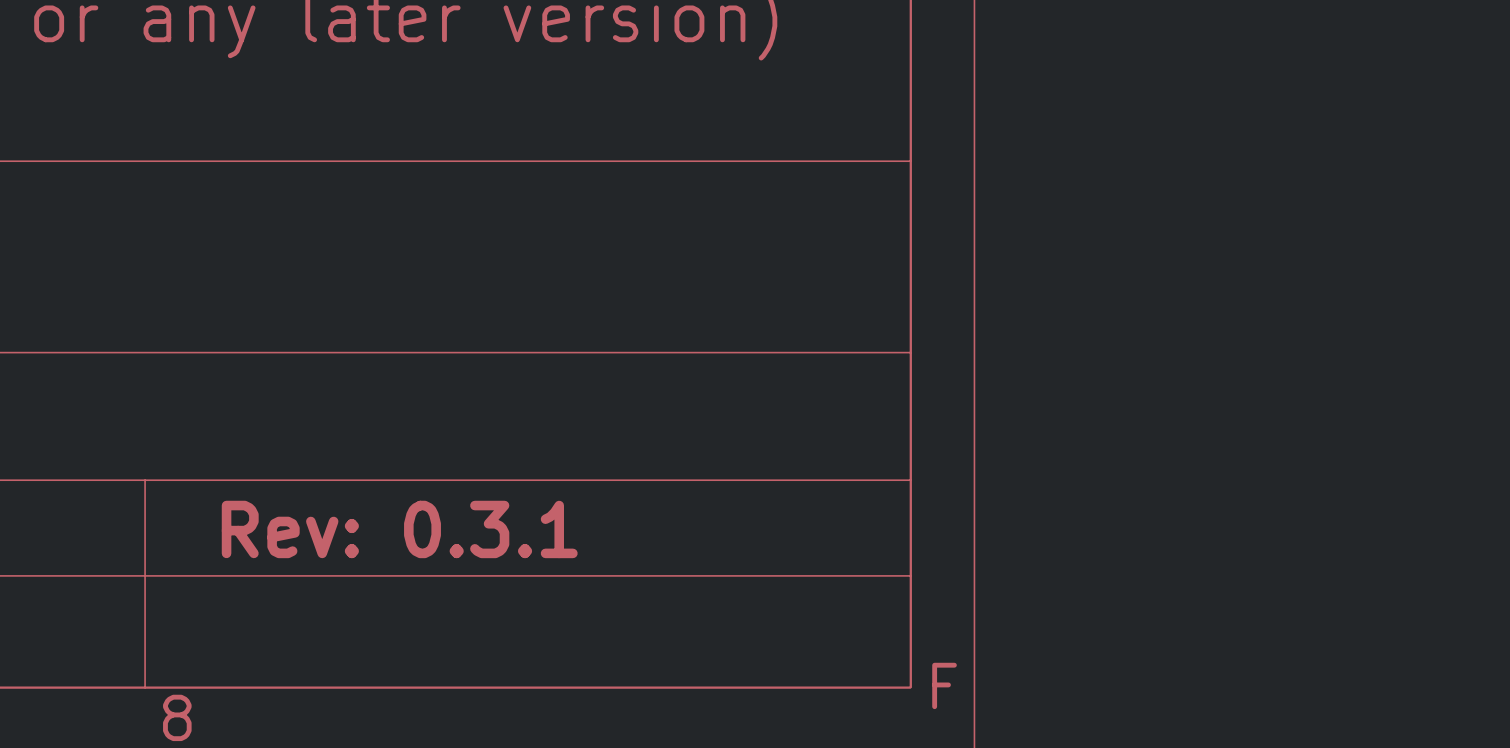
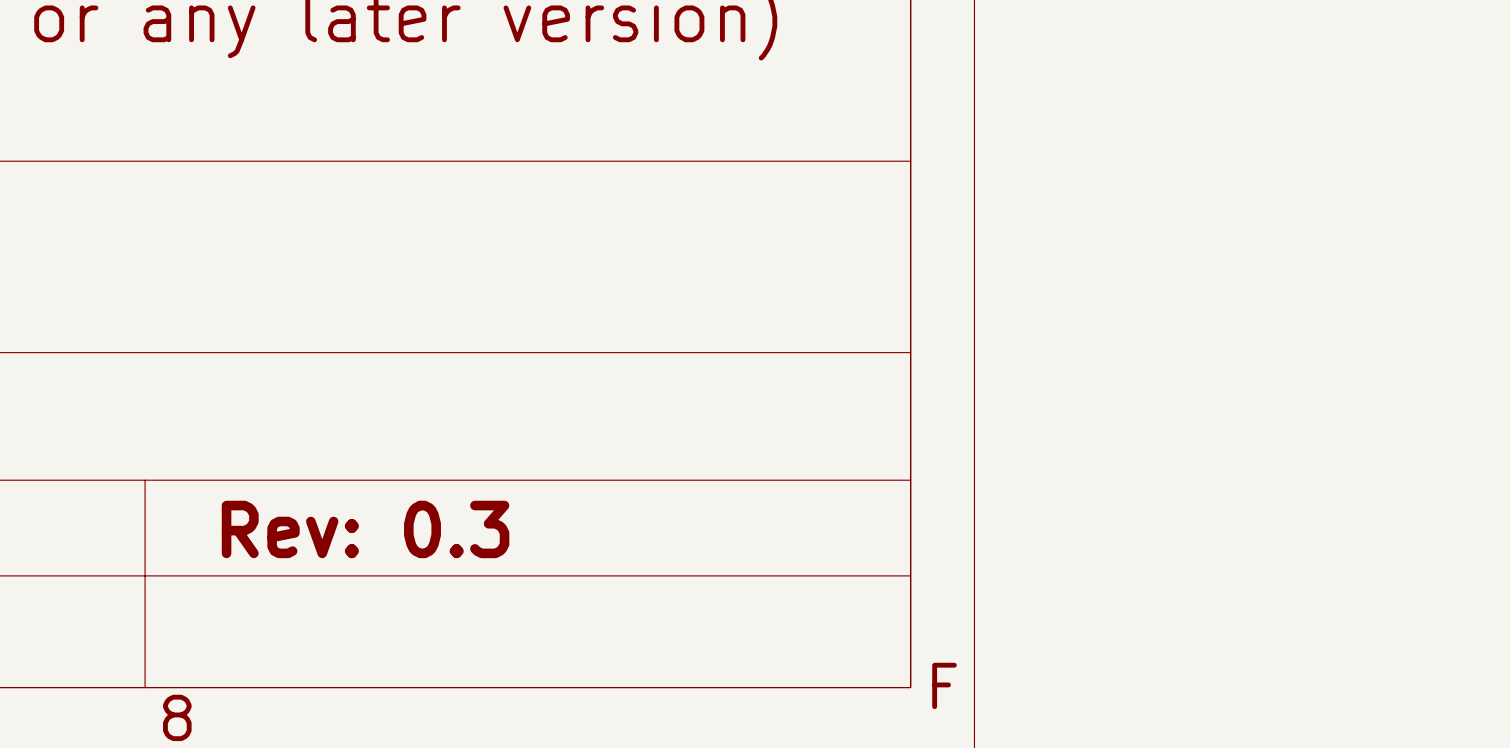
title block: Rev: 0.3.1 (399, 529) -> Rev: 0.3 (365, 529)

